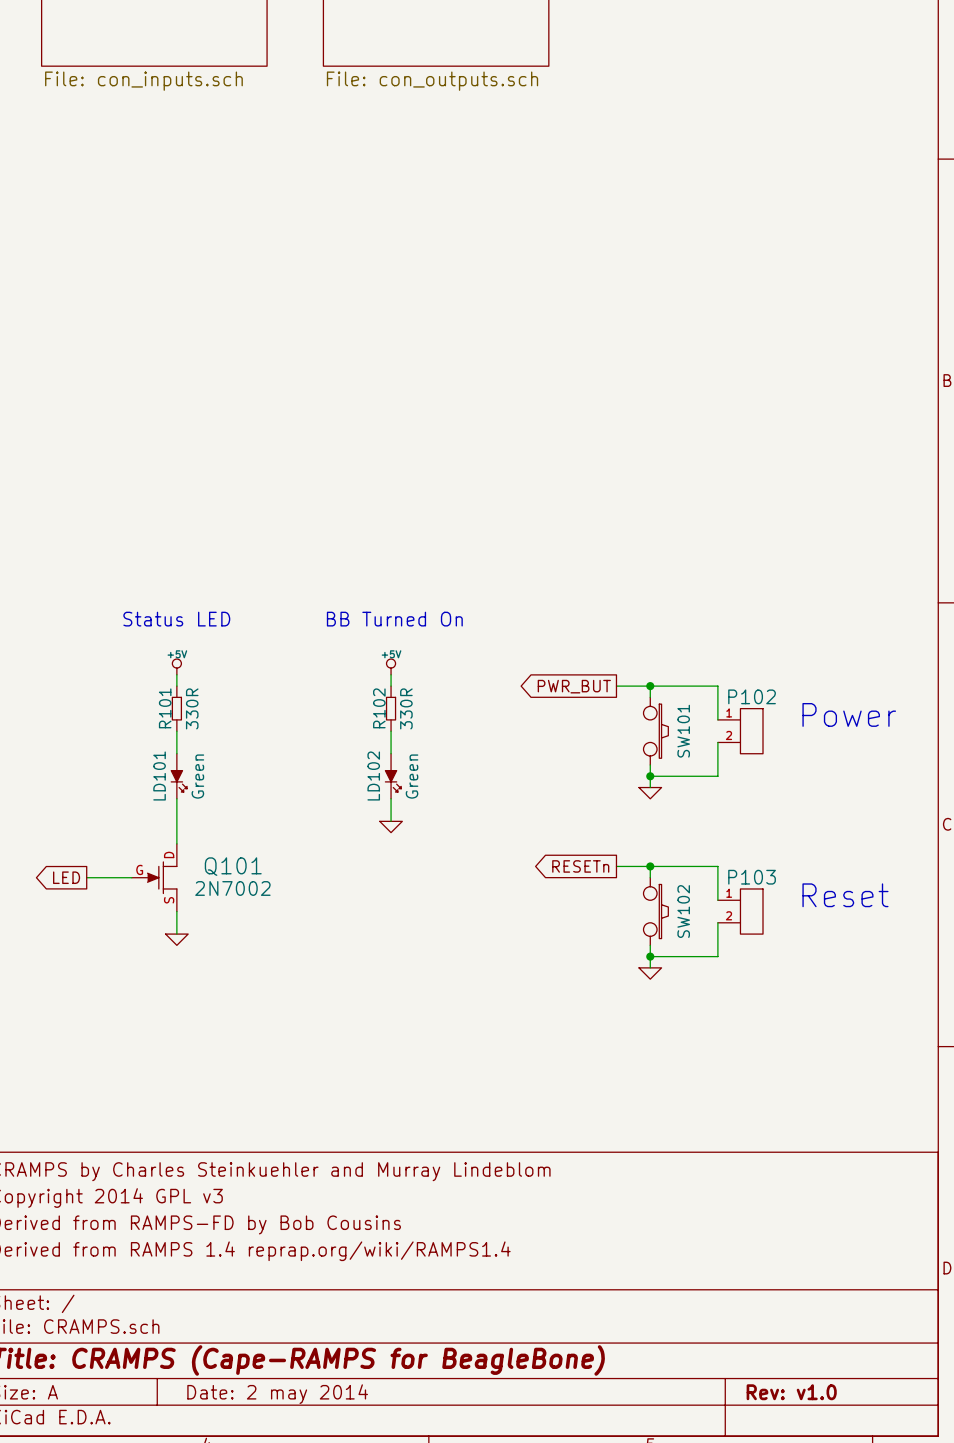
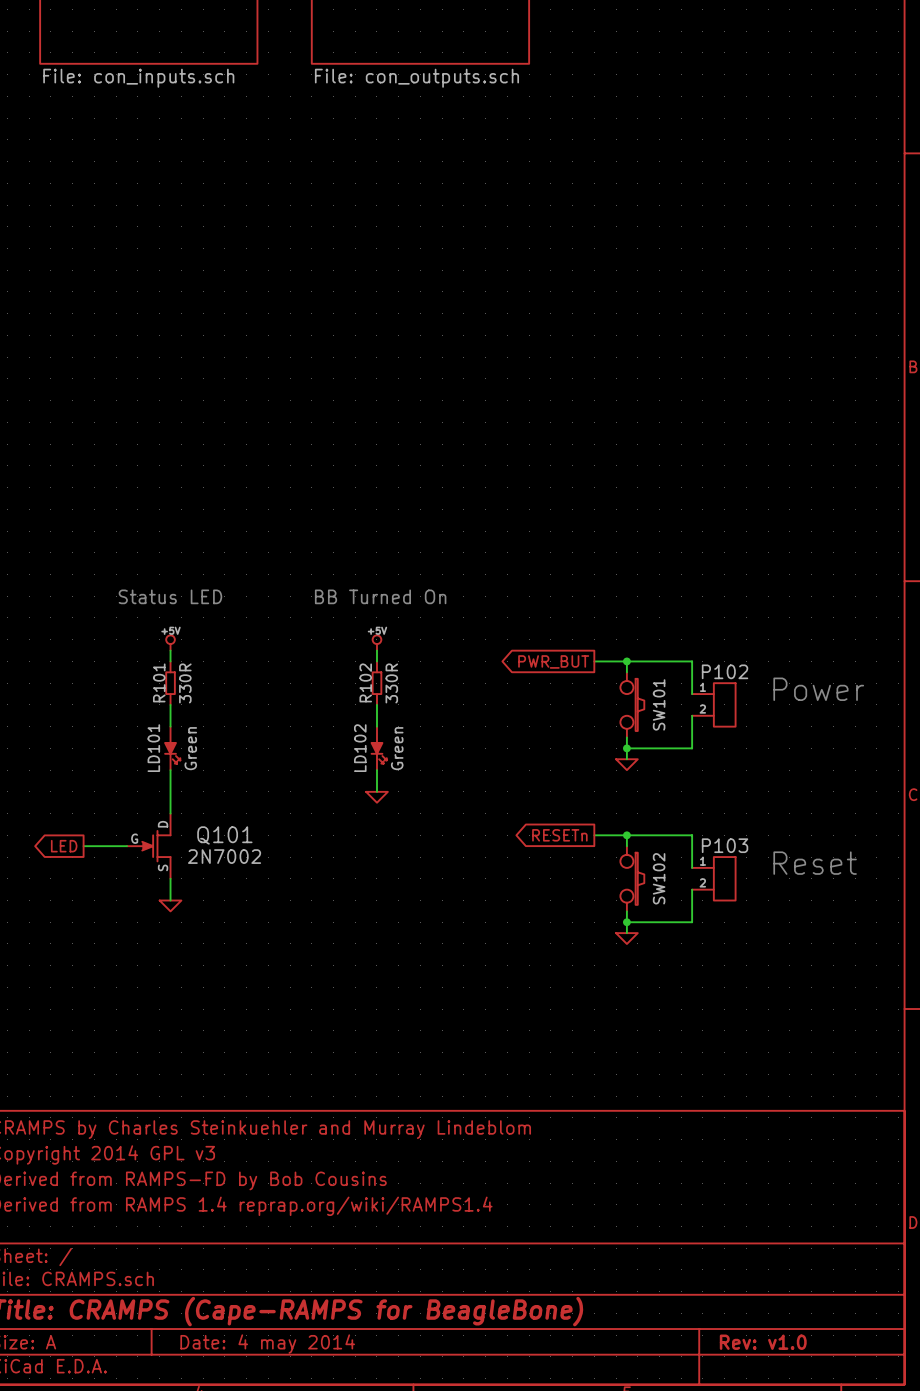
title block: Date: 2 may 2014 (277, 1394) -> Date: 4 may 2014 (267, 1344)

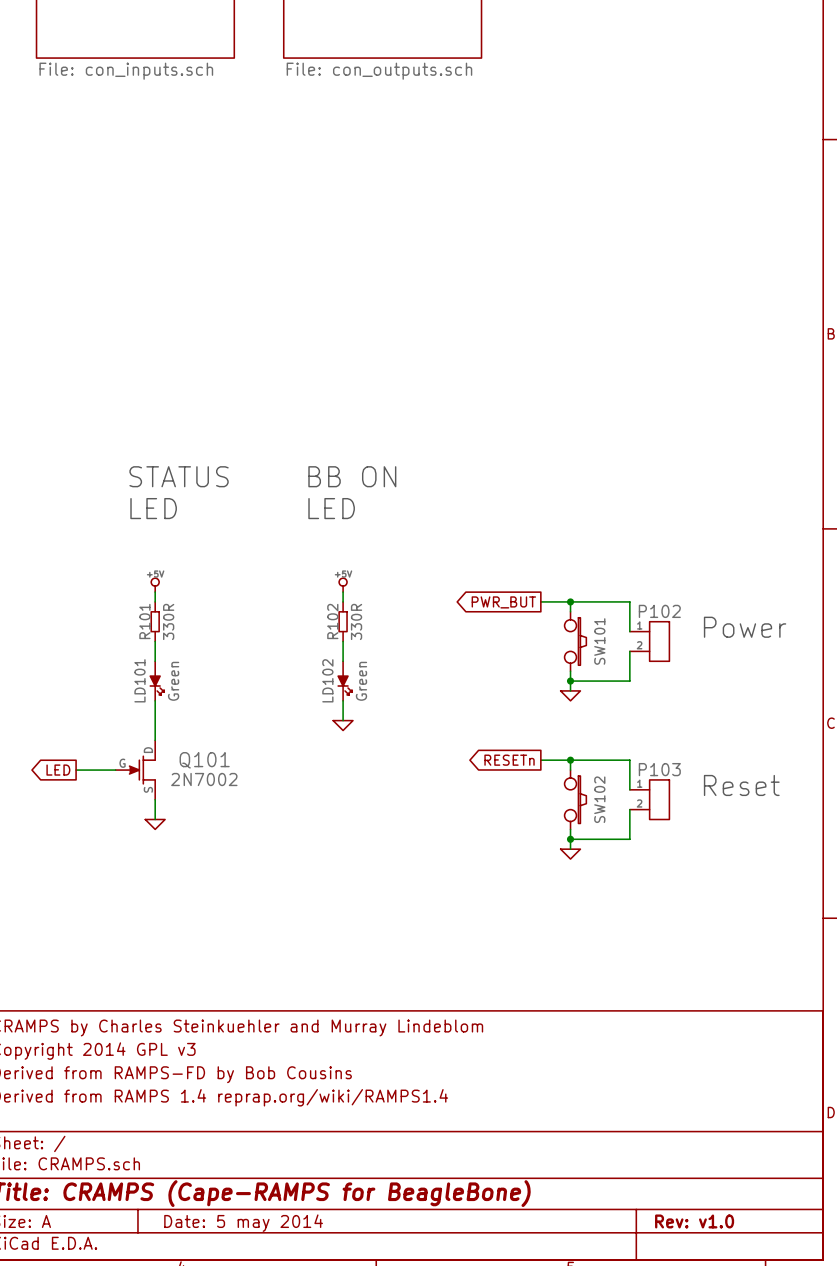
text: none -> STATUS (179, 476)
text: none -> BB ON (352, 476)
text: none -> LED (153, 508)
text: none -> LED (331, 508)
text: Status LED (170, 596) -> none
text: BB Turned On (380, 596) -> none
title block: Date: 4 may 2014 (267, 1344) -> Date: 5 may 2014 (243, 1223)

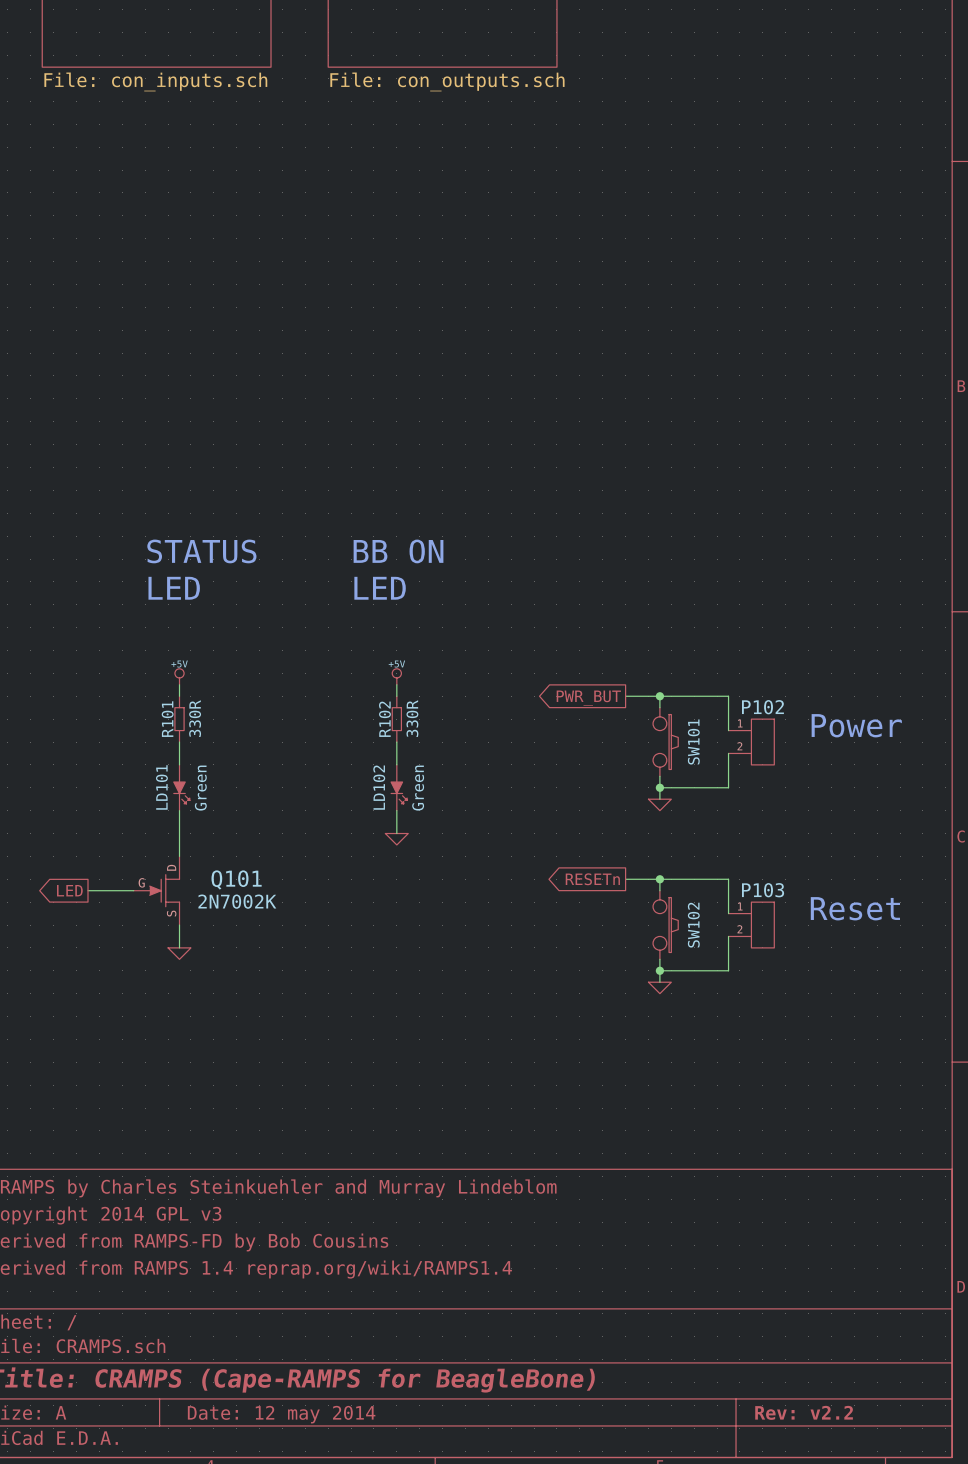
Q101 value: 2N7002 (204, 779) -> 2N7002K (237, 901)
title block: Rev: v1.0 (694, 1221) -> Rev: v2.2 (804, 1412)
title block: Date: 5 may 2014 (243, 1223) -> Date: 12 may 2014 (281, 1414)

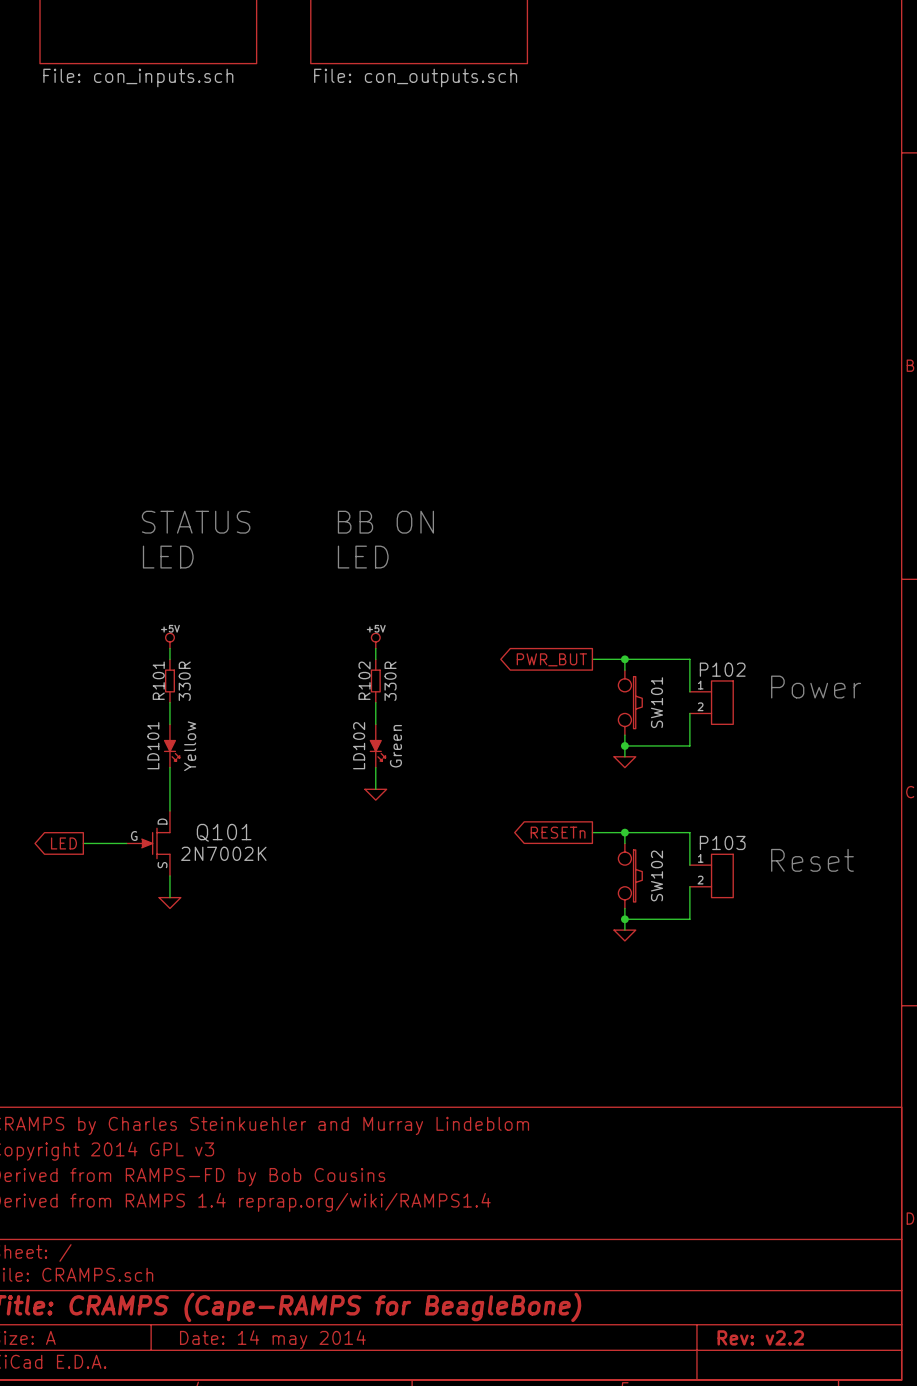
LD101 value: Green (200, 788) -> Yellow (190, 746)
title block: Date: 12 may 2014 (281, 1414) -> Date: 14 may 2014 (272, 1339)

